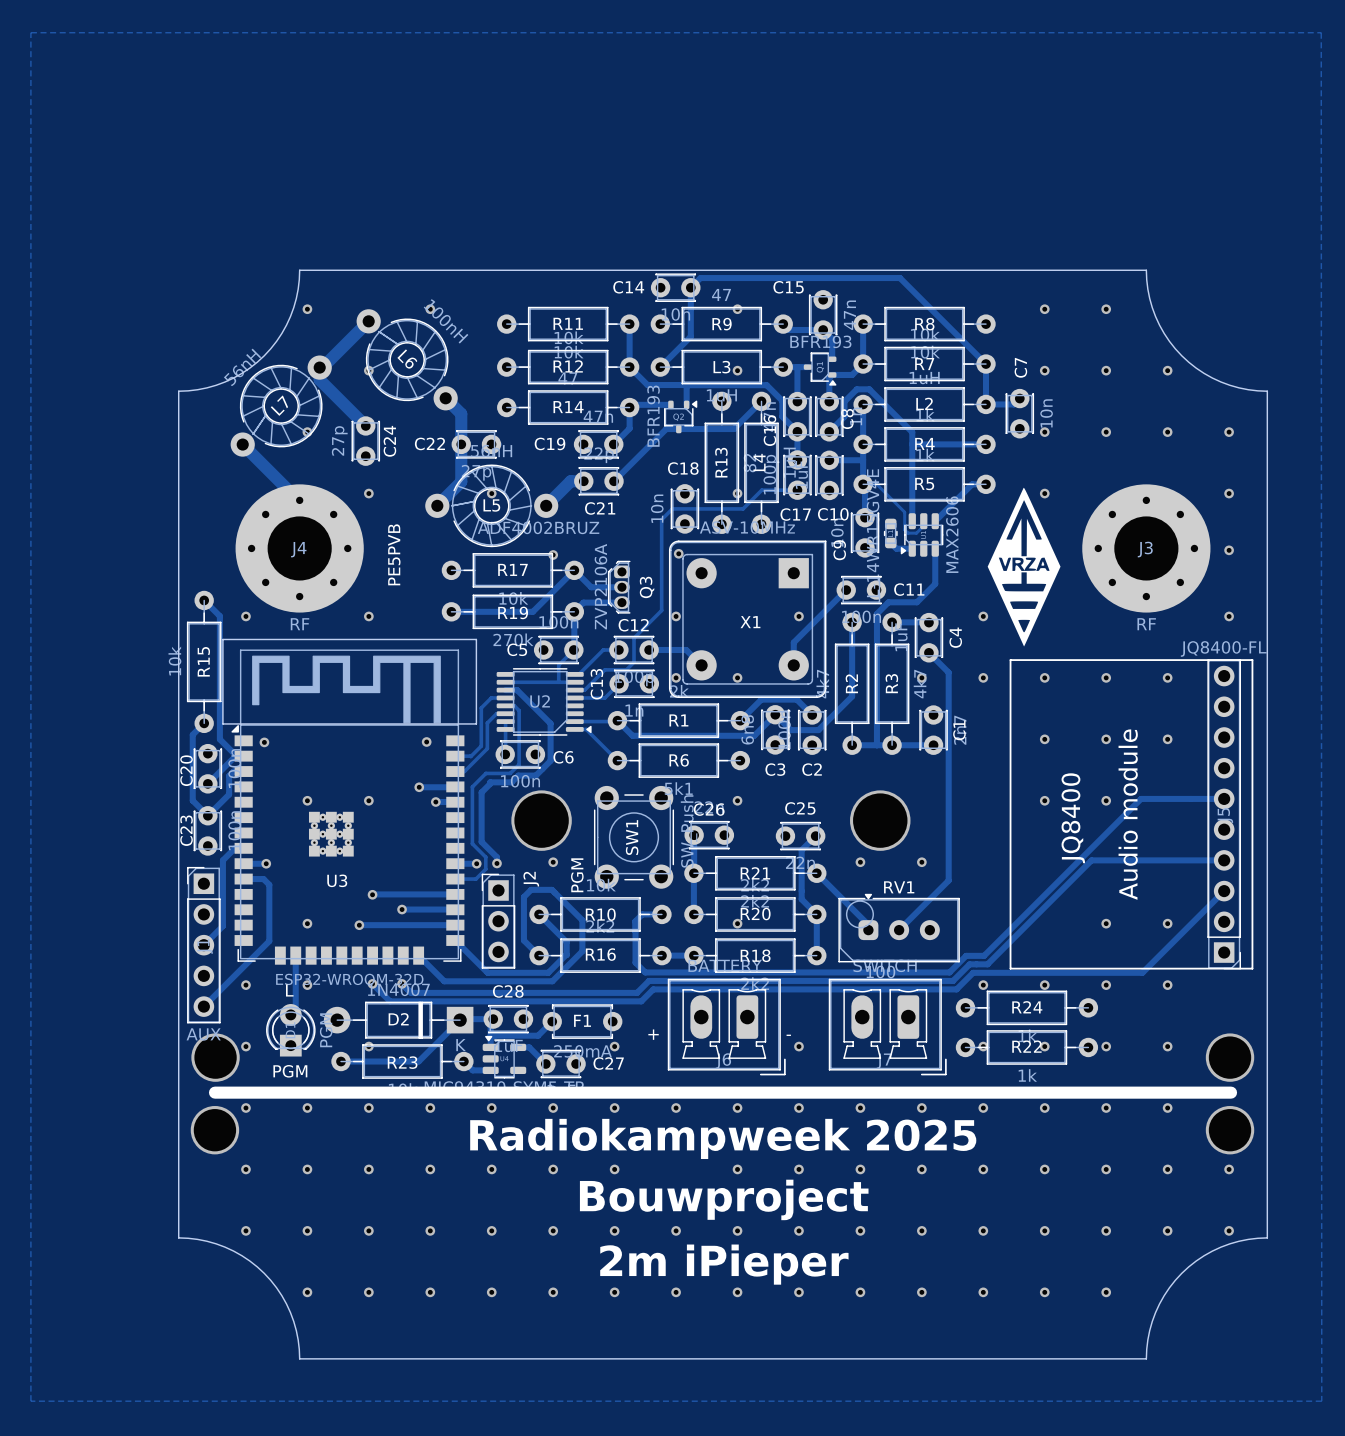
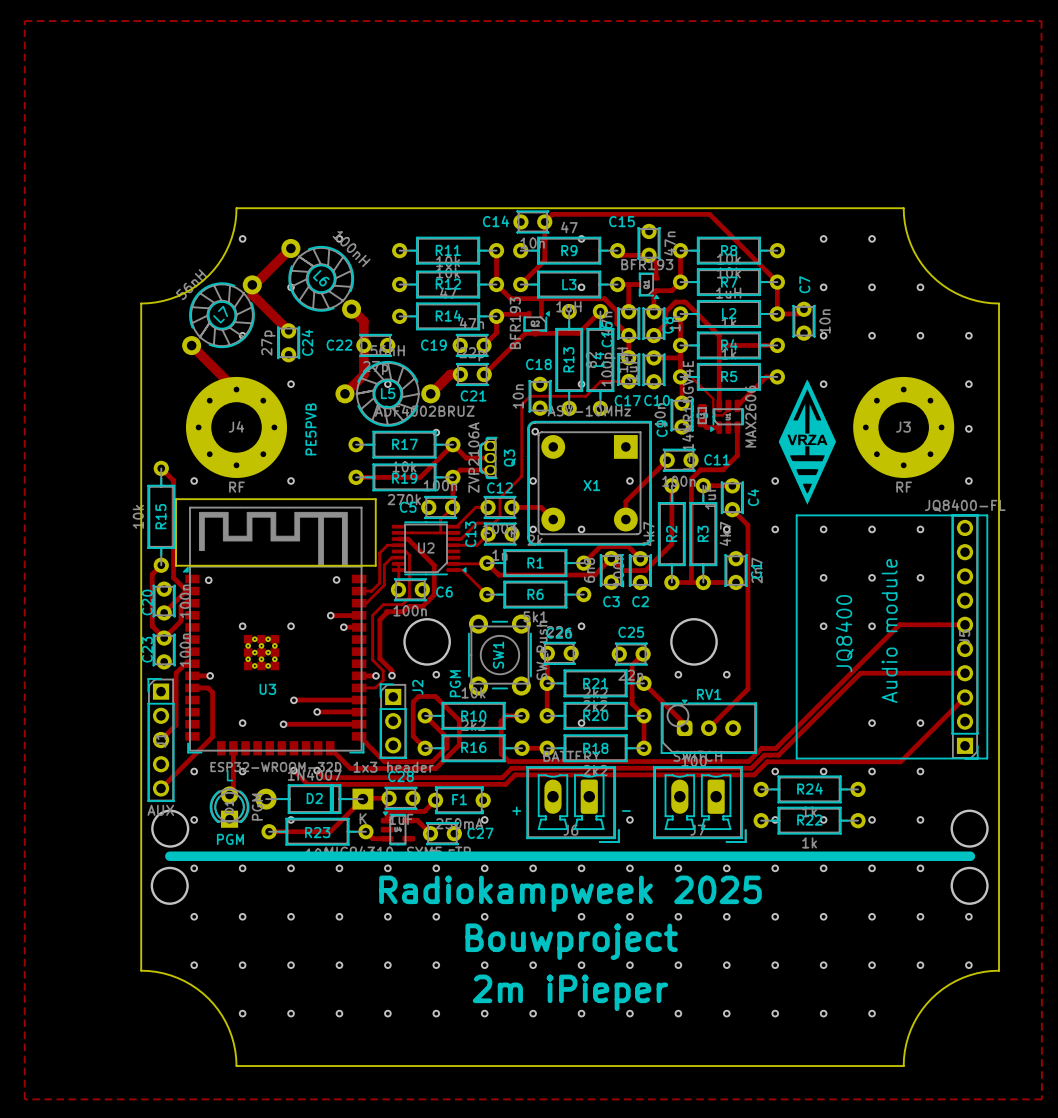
J2 value: none -> 1x3 header (393, 767)

